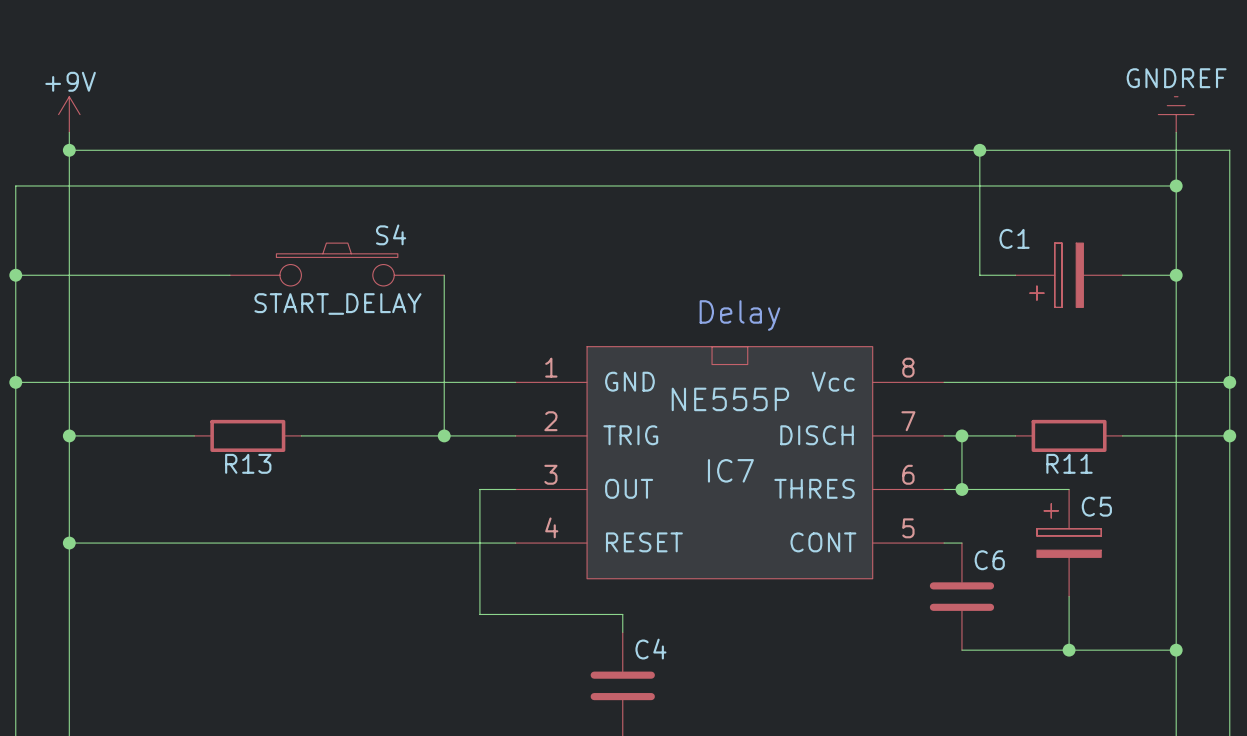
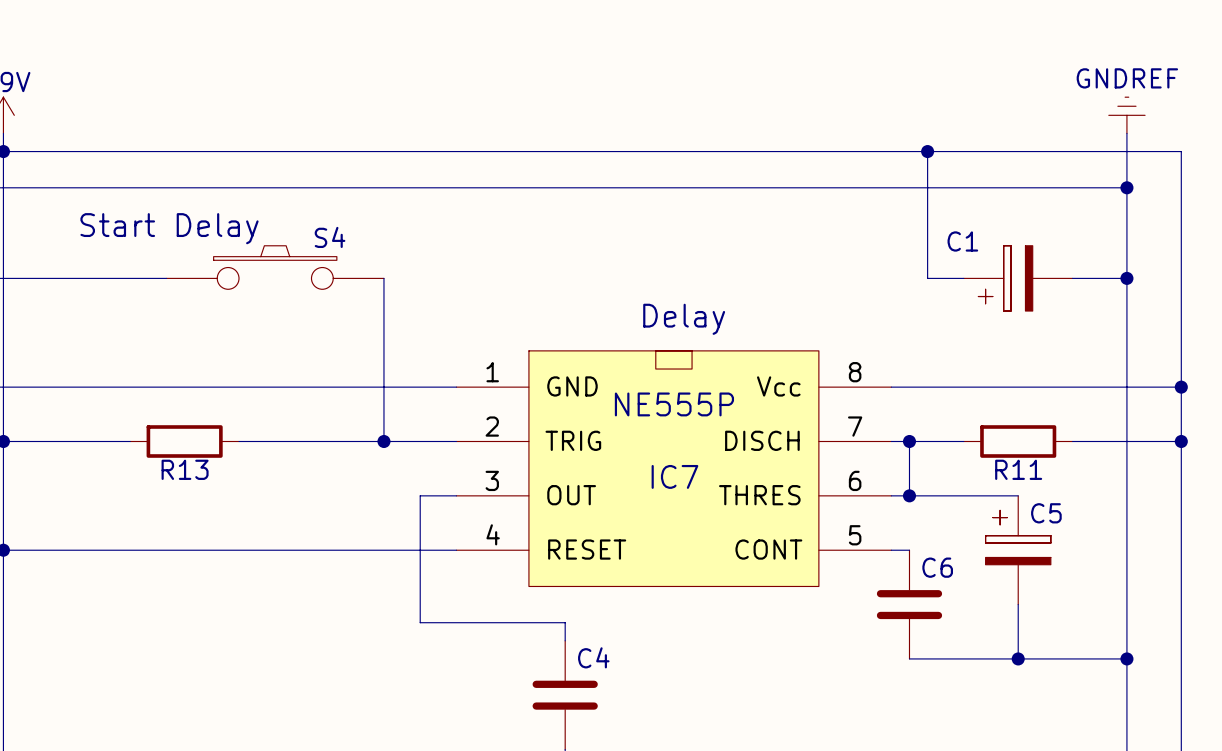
text: none -> Start Delay (169, 228)
S4 value: START_DELAY (337, 304) -> none

